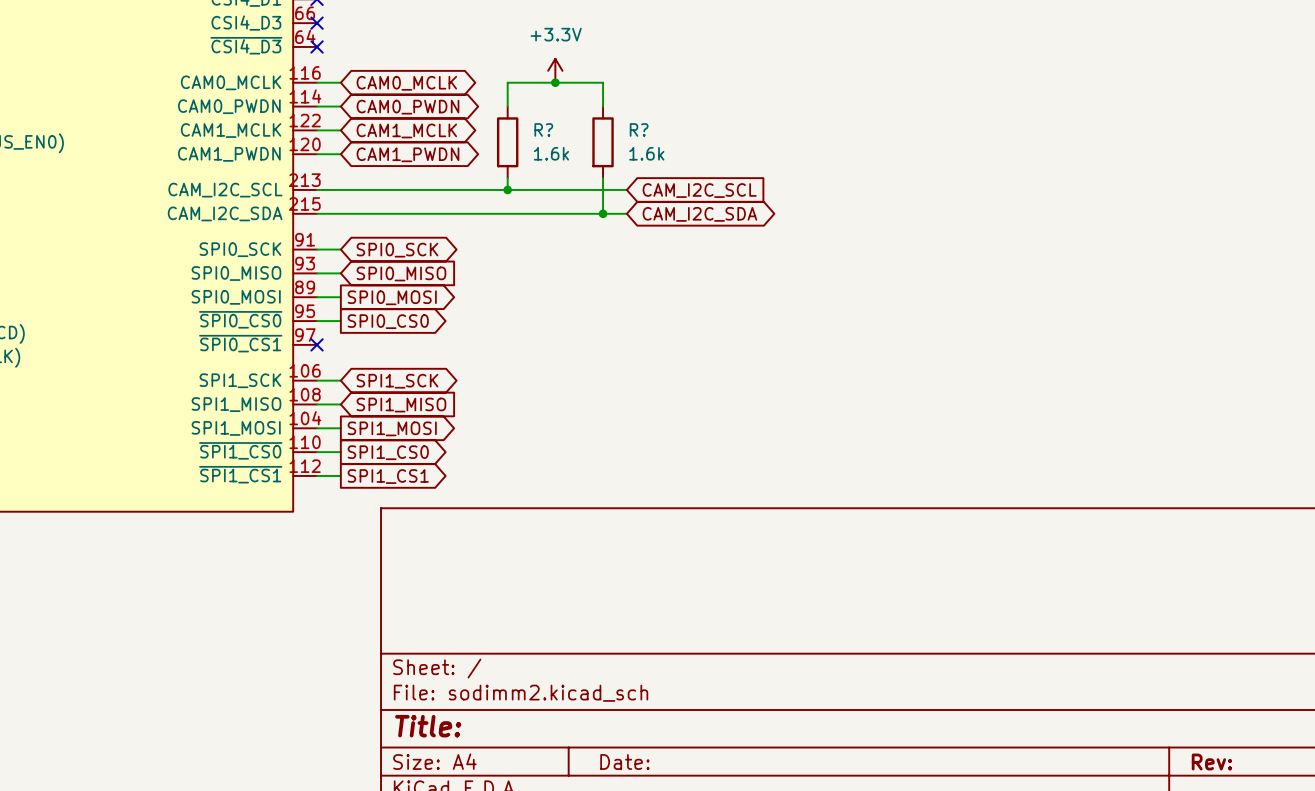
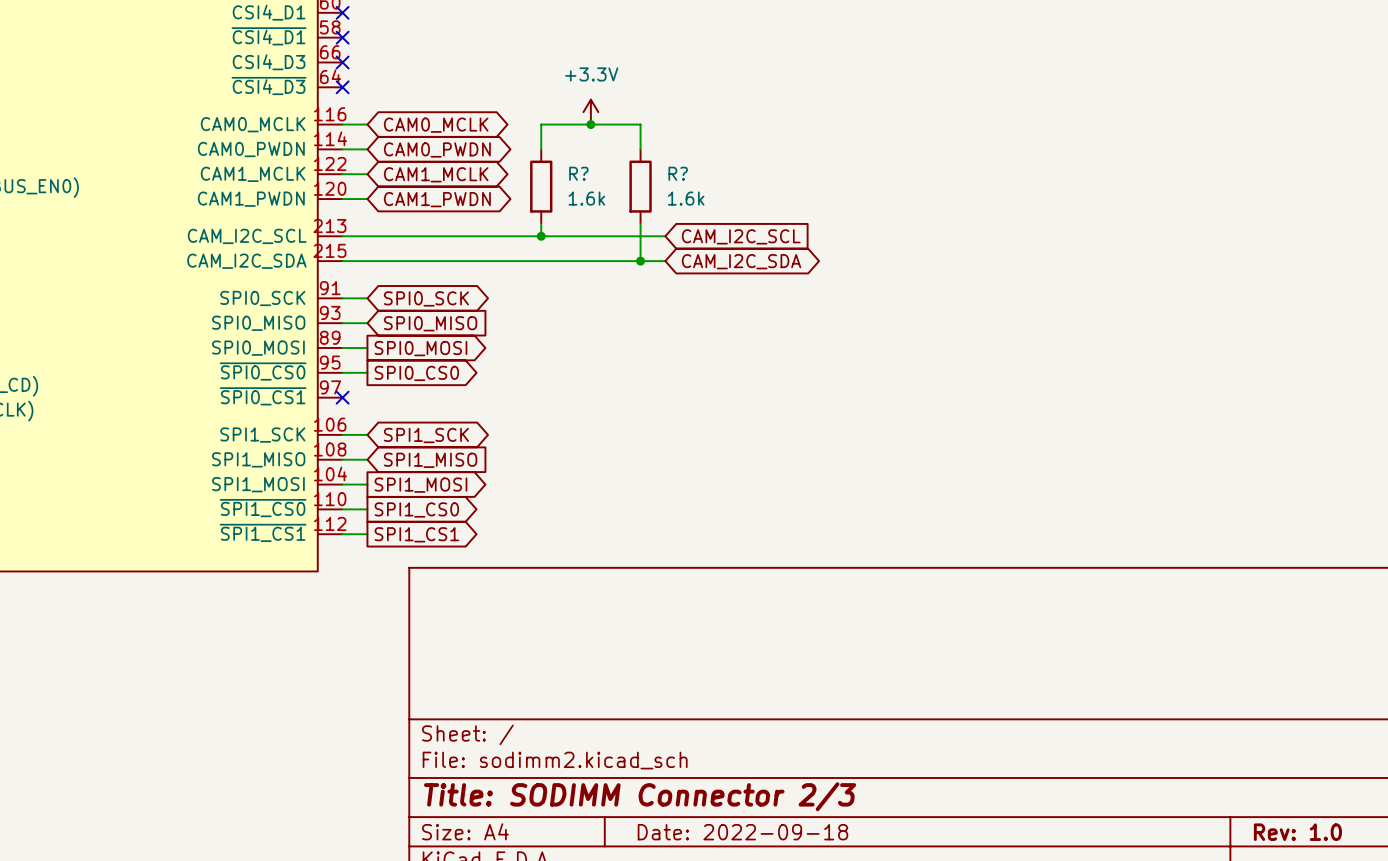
title block: Title: (428, 726) -> Title: SODIMM Connector 2/3 (640, 796)
title block: Date: (624, 762) -> Date: 2022-09-18 (742, 832)
title block: Rev: (1211, 762) -> Rev: 1.0 (1297, 832)

